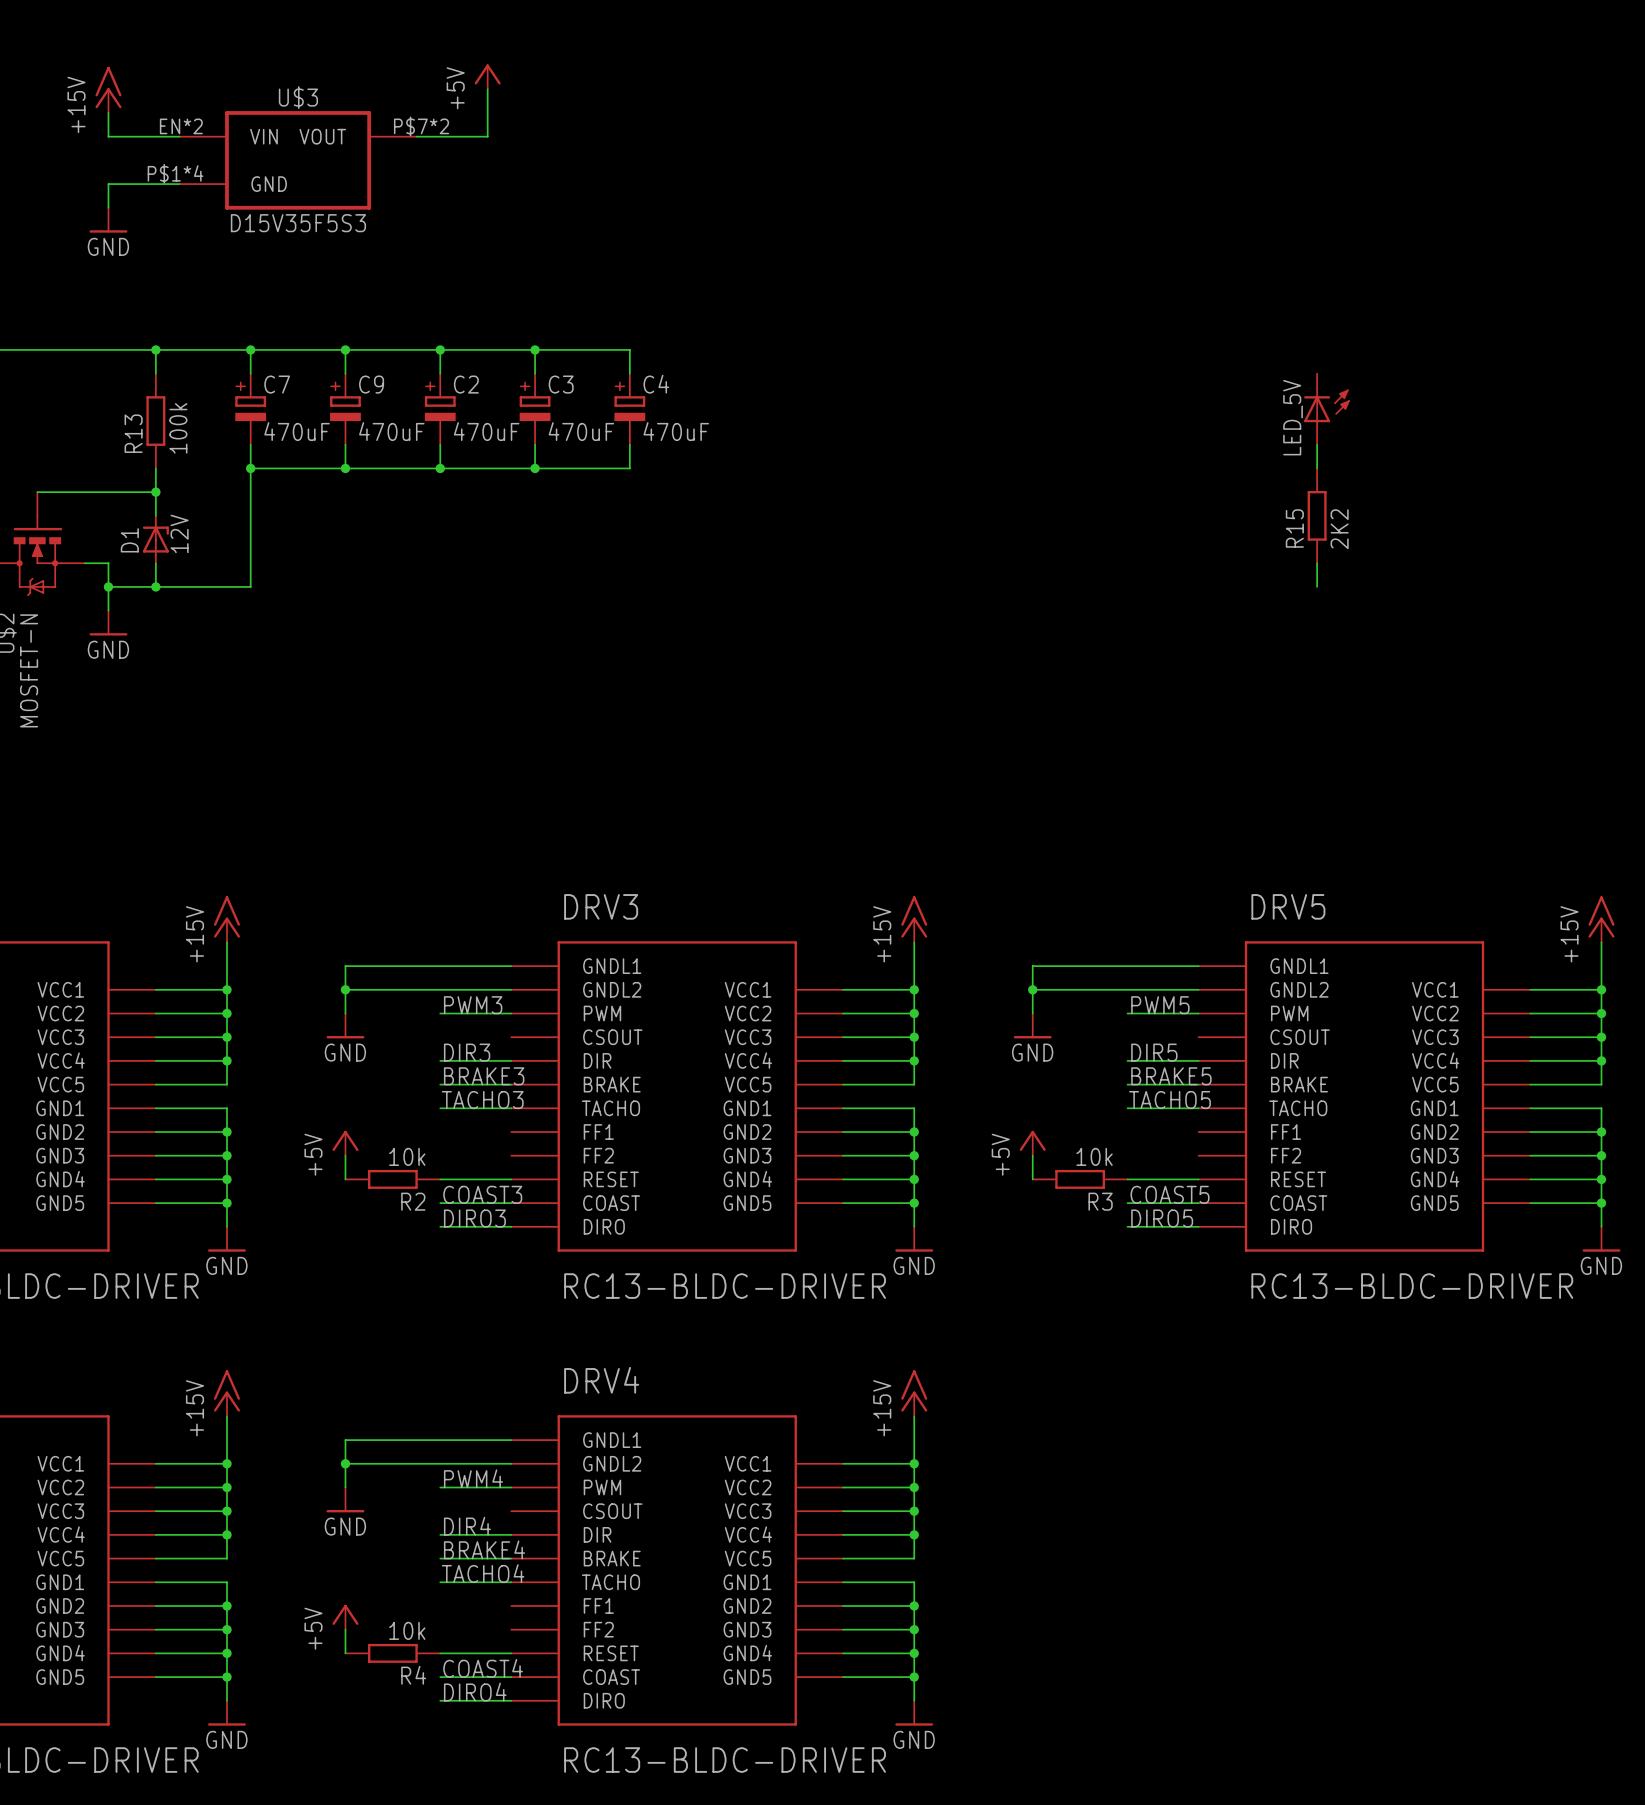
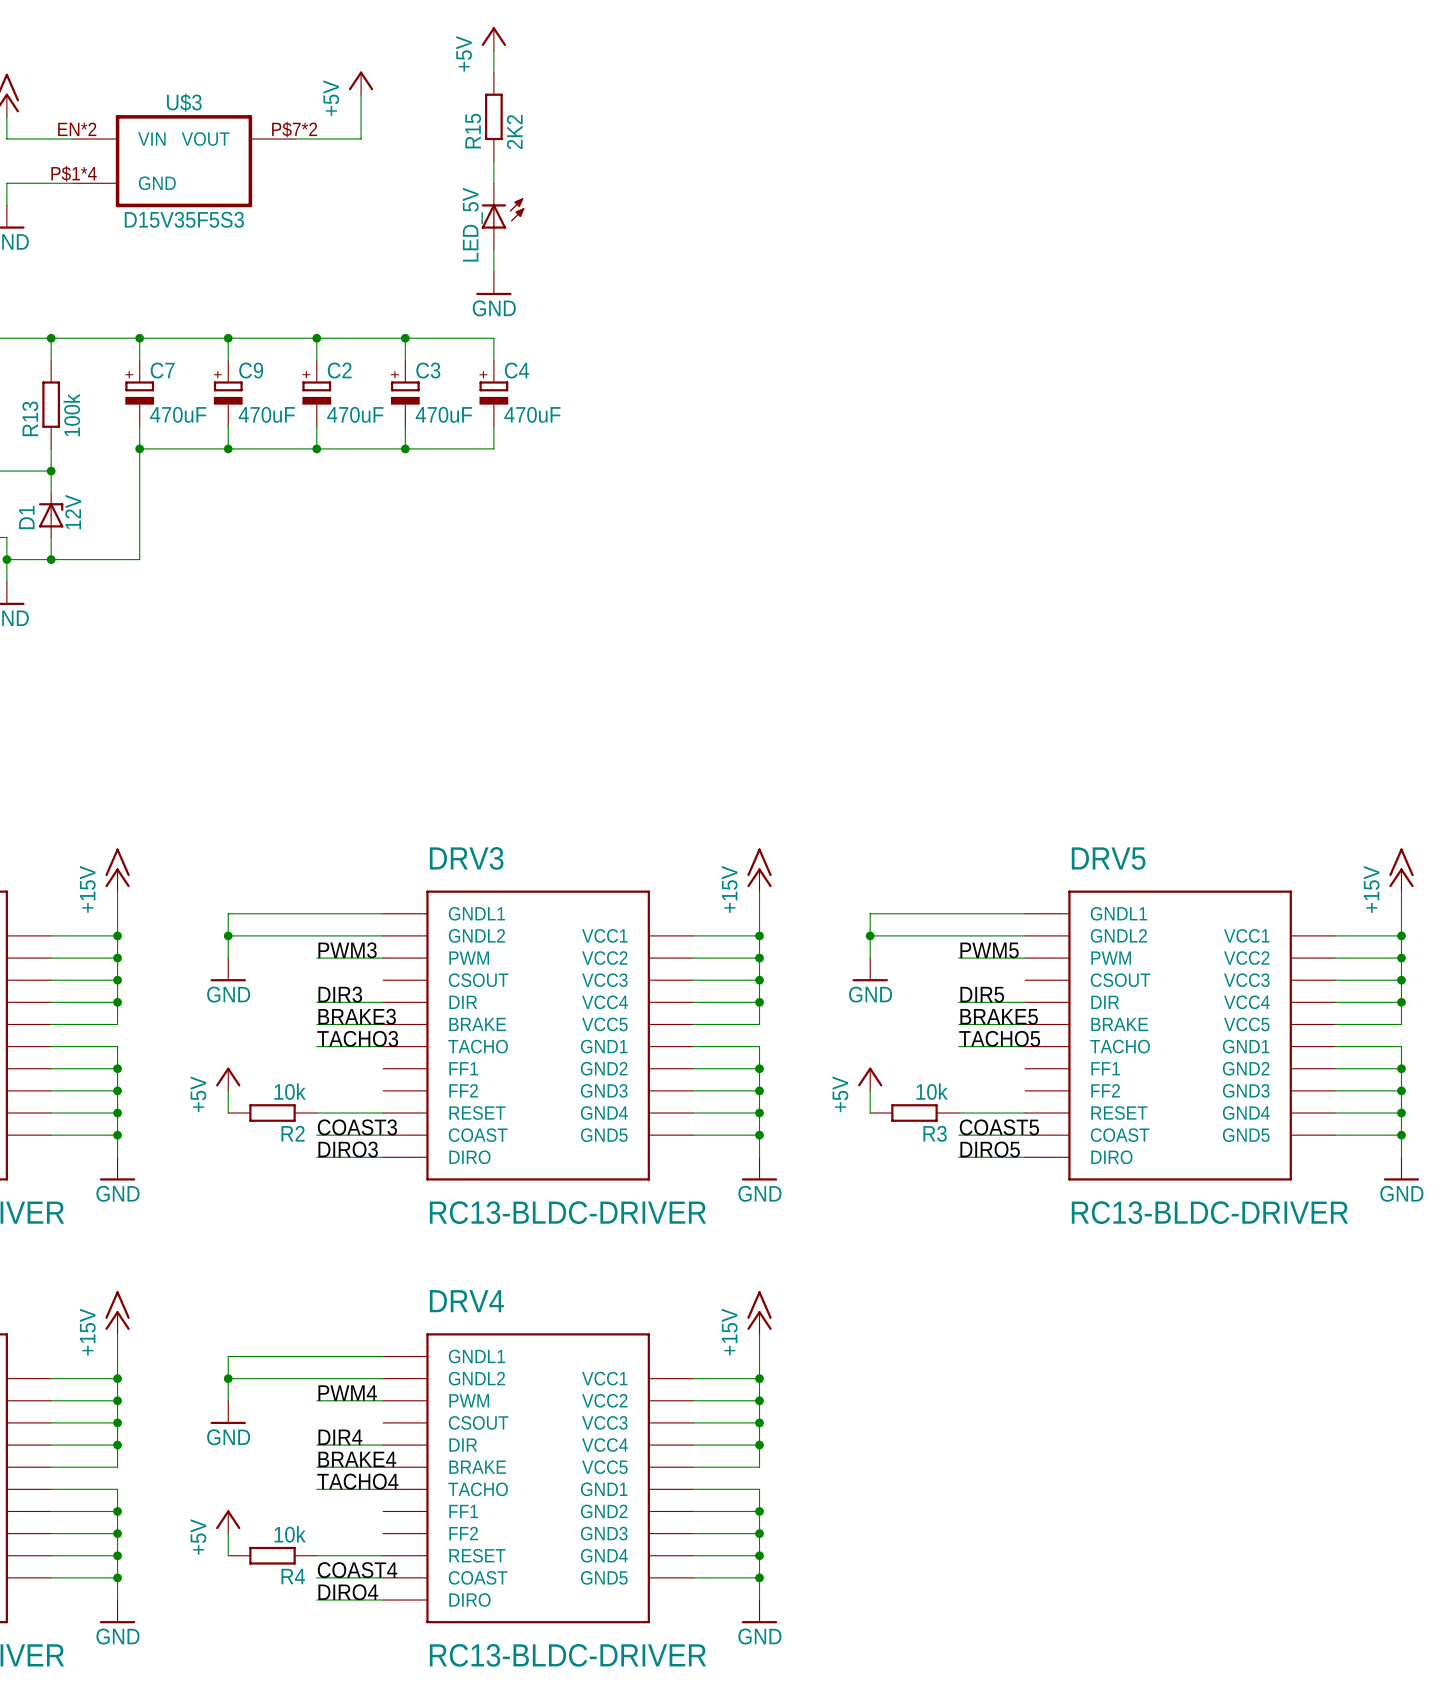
power symbol: none -> +5V (493, 38)
wire: none -> (493, 50) (493, 72)
wire: none -> (493, 161) (493, 183)
wire: none -> (493, 249) (493, 271)
power symbol: none -> GND (493, 283)
LED_5V position: (1326, 409) -> (503, 216)
wire: (1317, 444) (1317, 468) -> none
R15 position: (1317, 515) -> (493, 116)
wire: (1317, 563) (1317, 586) -> none

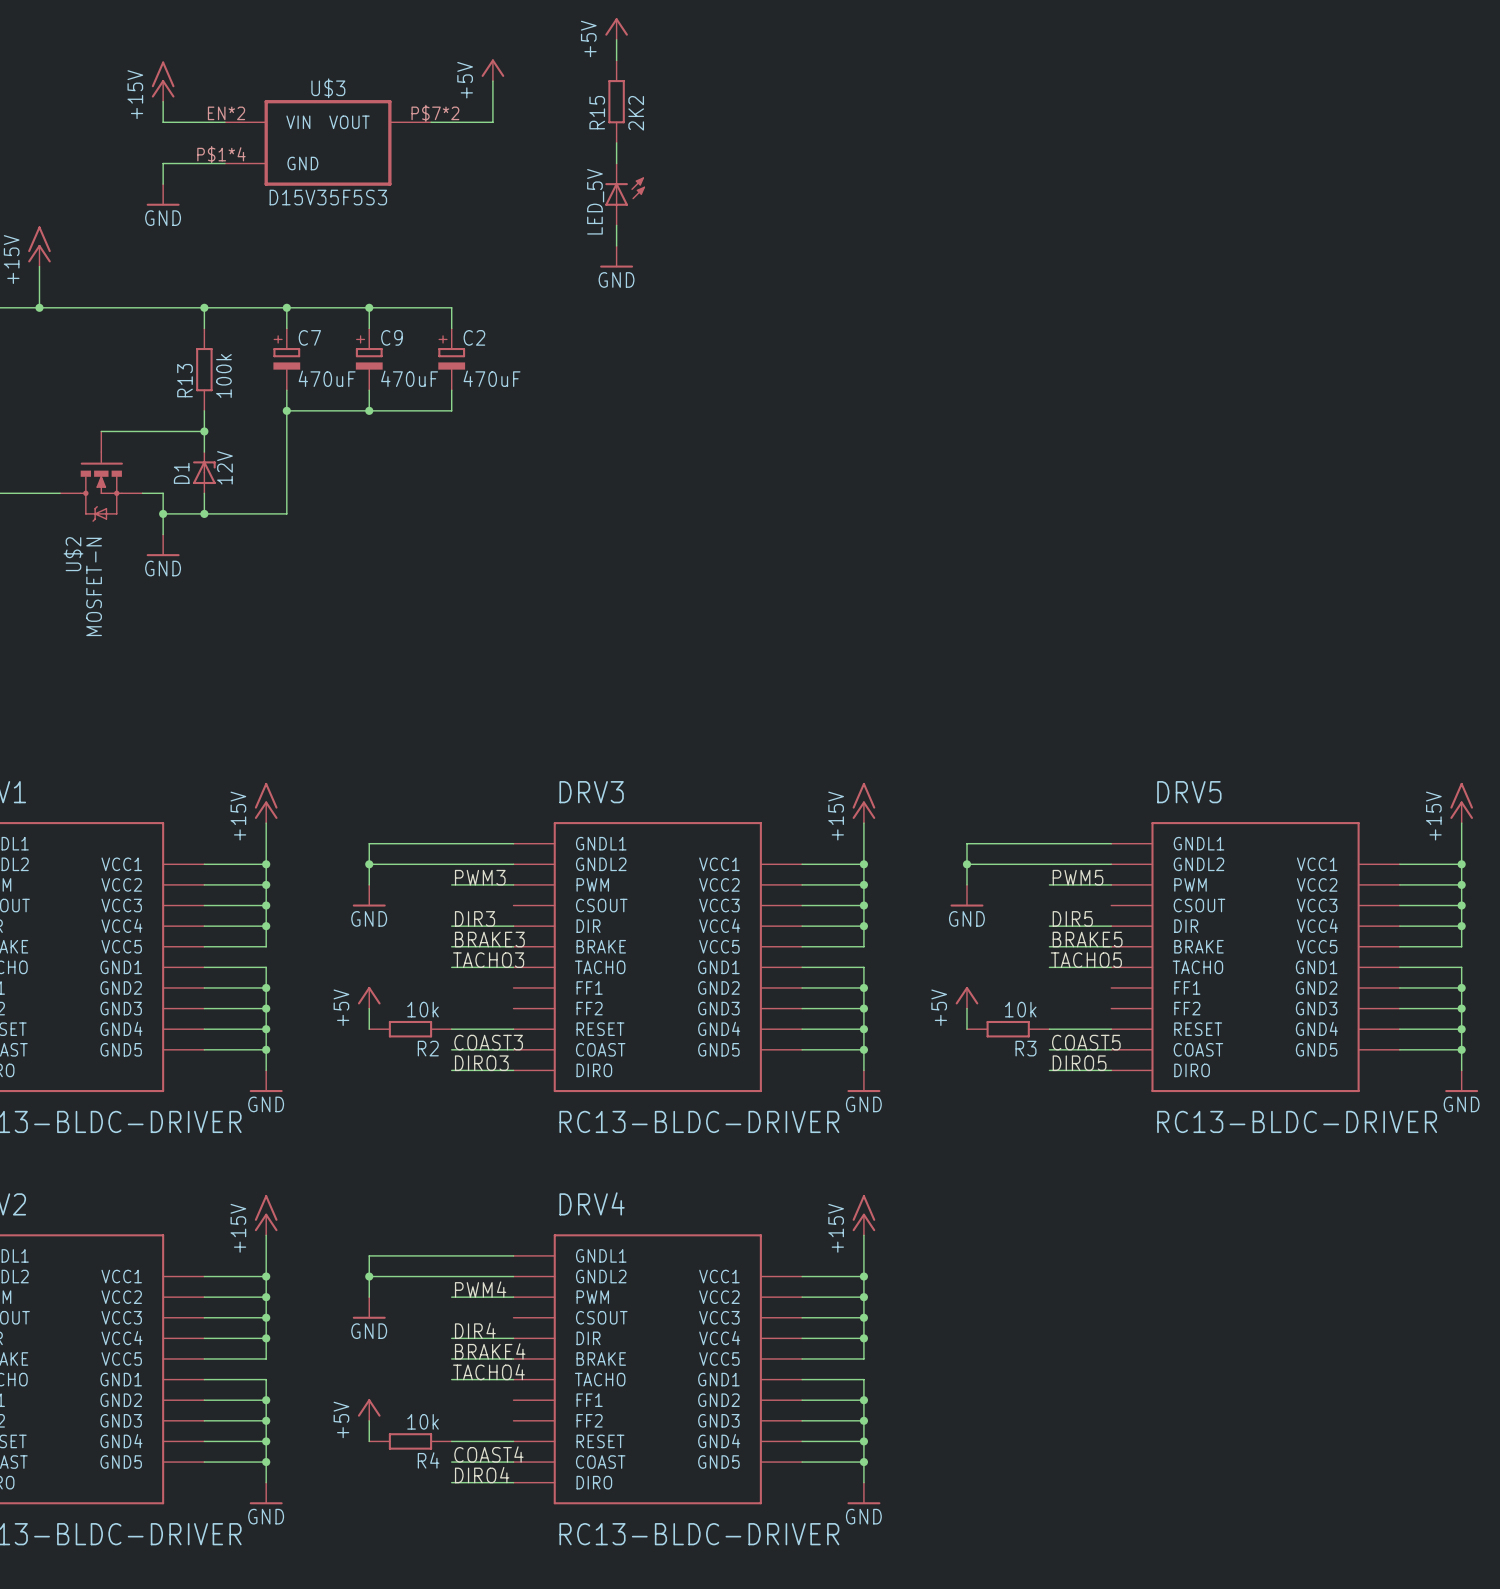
wire: (316, 338) (493, 338) (493, 360) -> none
junction: (316, 338) -> none
wire: (405, 338) (405, 360) -> none
junction: (405, 338) -> none
C3: 470uF (405, 393) -> none
C4: 470uF (493, 393) -> none
wire: (405, 426) (405, 448) -> none
wire: (493, 426) (493, 448) (316, 448) -> none
junction: (316, 448) -> none
junction: (405, 448) -> none

